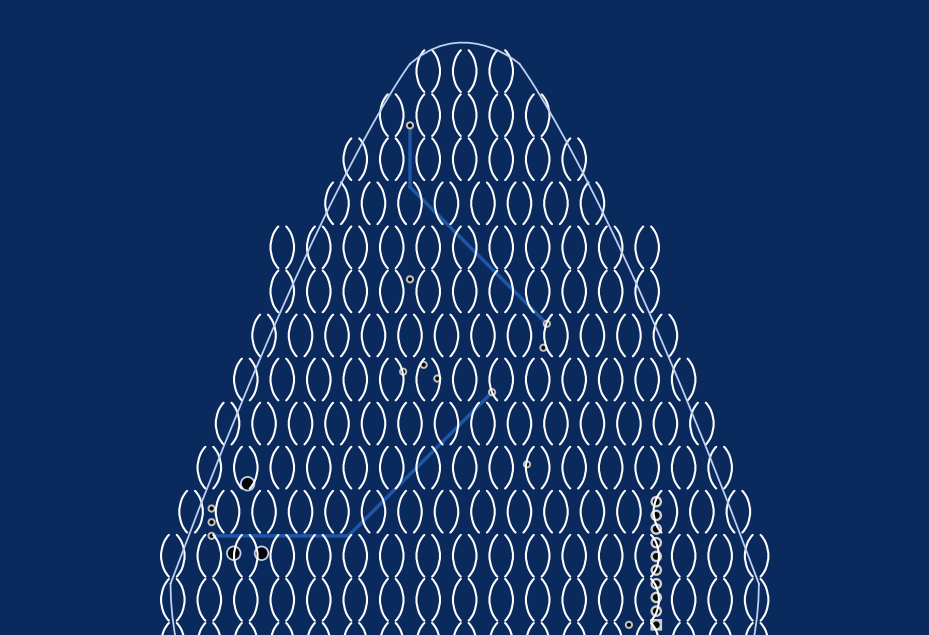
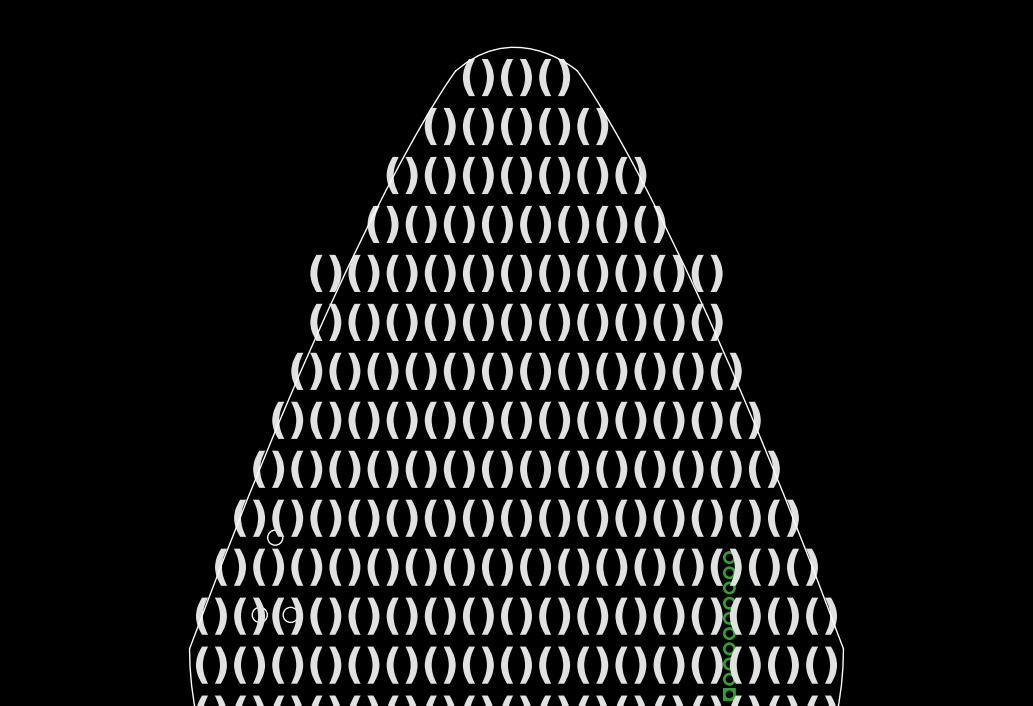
track: (409, 125) (409, 186) (546, 323) -> none
via: (409, 125) -> none
via: (409, 279) -> none
via: (546, 323) -> none
via: (543, 347) -> none
via: (423, 364) -> none
via: (403, 371) -> none
via: (437, 378) -> none
track: (492, 392) (348, 535) (211, 535) -> none
via: (492, 392) -> none
via: (526, 464) -> none
via: (211, 508) -> none
via: (211, 522) -> none
via: (211, 535) -> none
via: (628, 624) -> none

